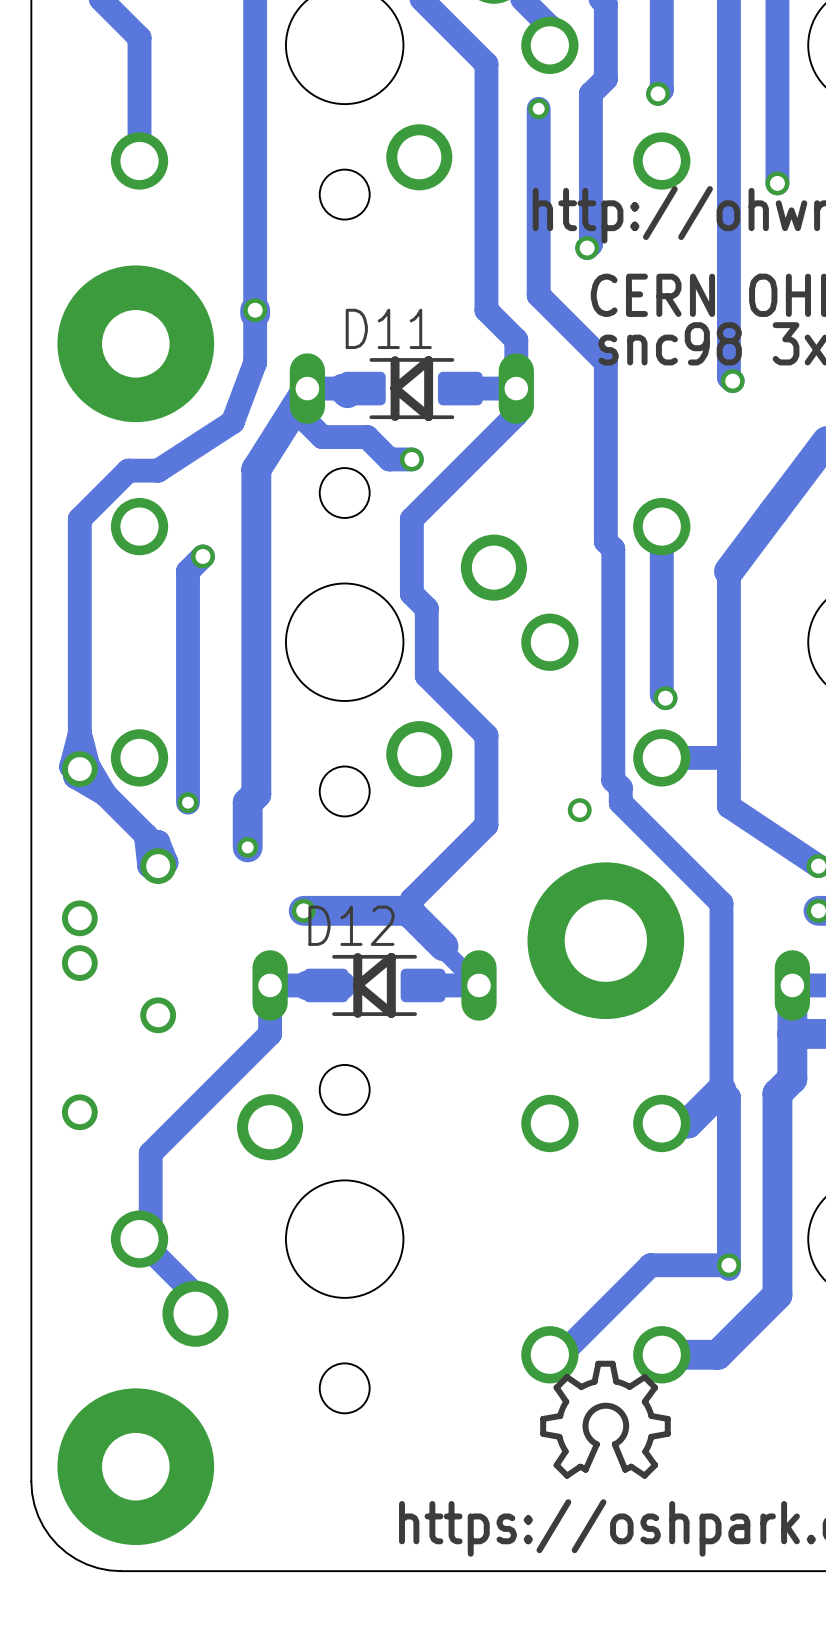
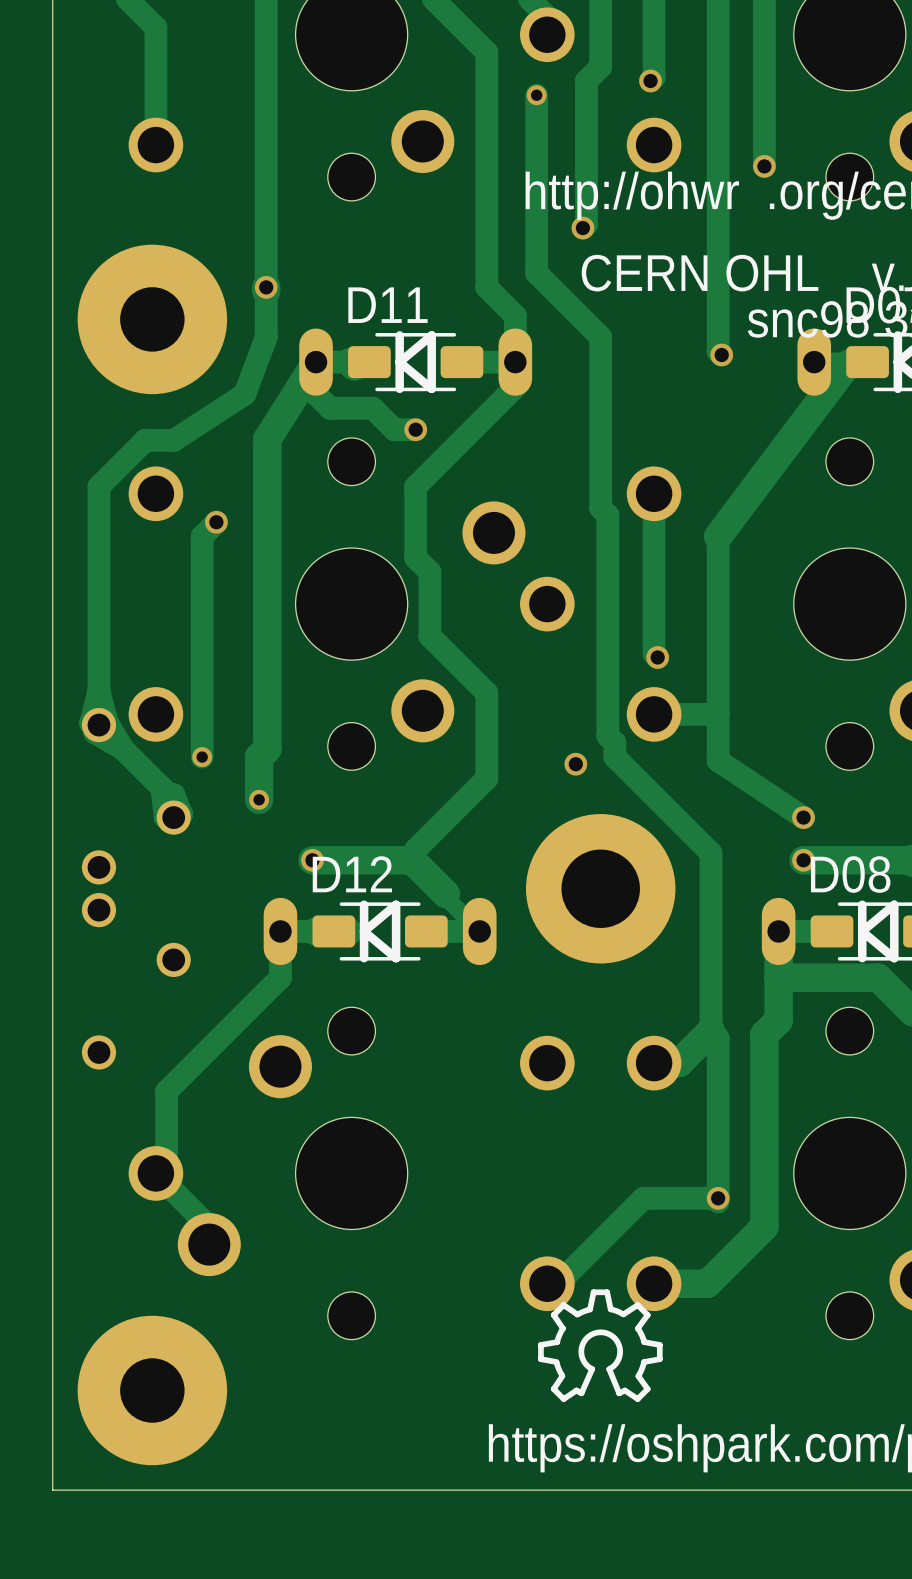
board edge: (31, 1481) (32, 1493) (38, 1515) (43, 1526) (57, 1544) (76, 1559) (86, 1564) (109, 1570) (120, 1571) -> (52, 1404) (52, 1490) (138, 1490)

